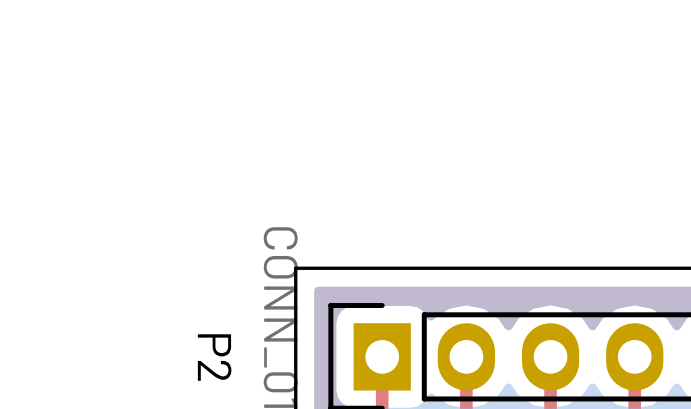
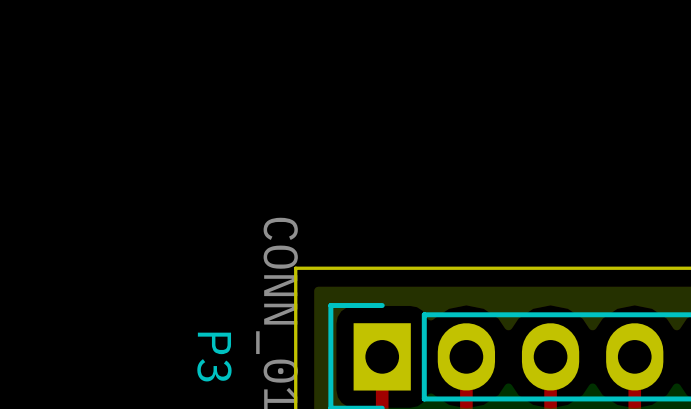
P2 name: P2 (214, 357) -> P3 (214, 357)

